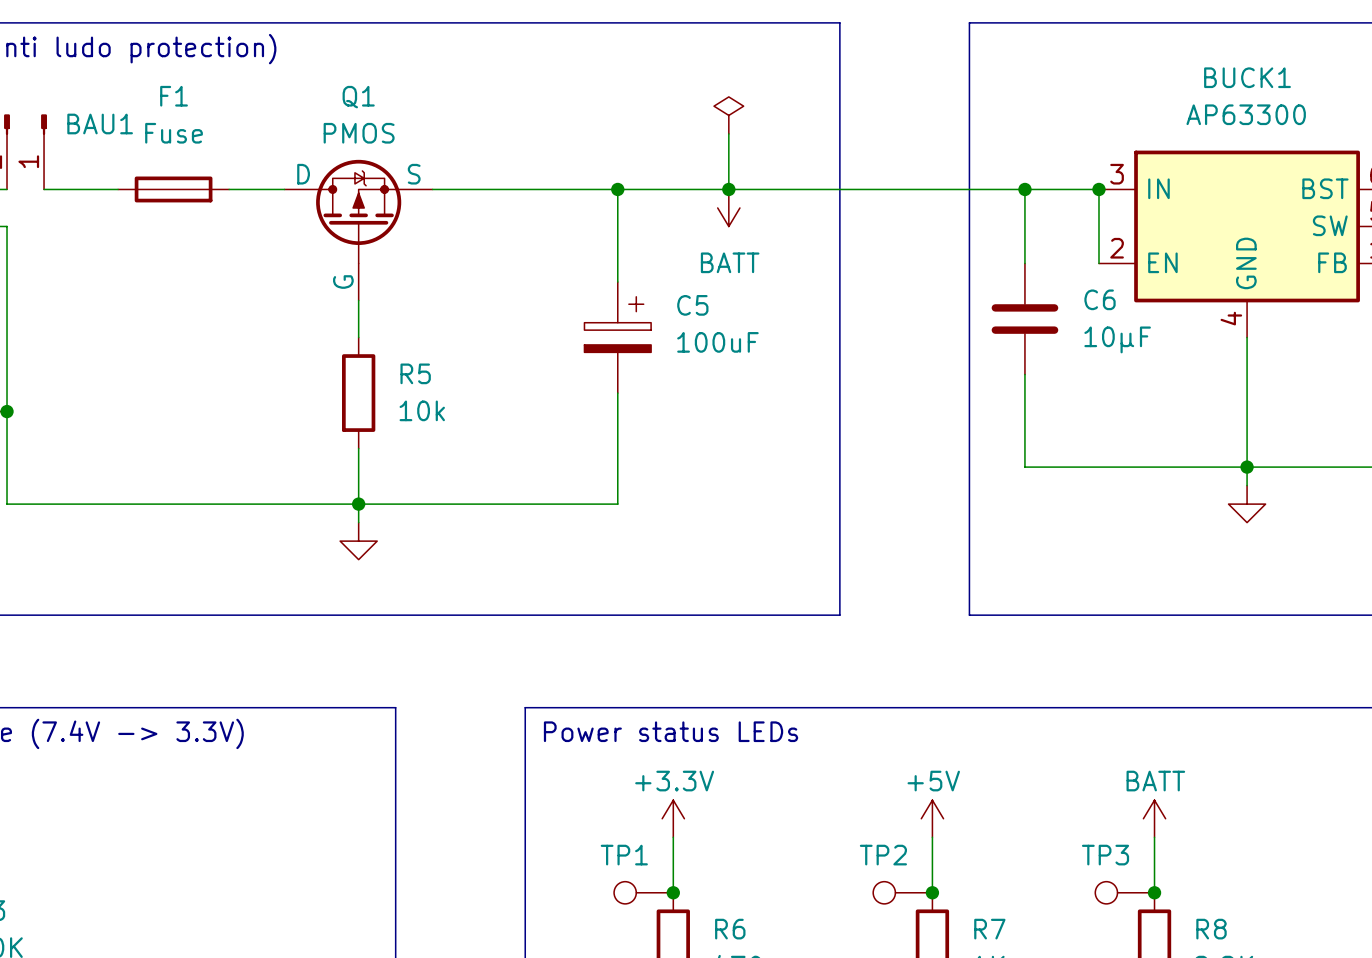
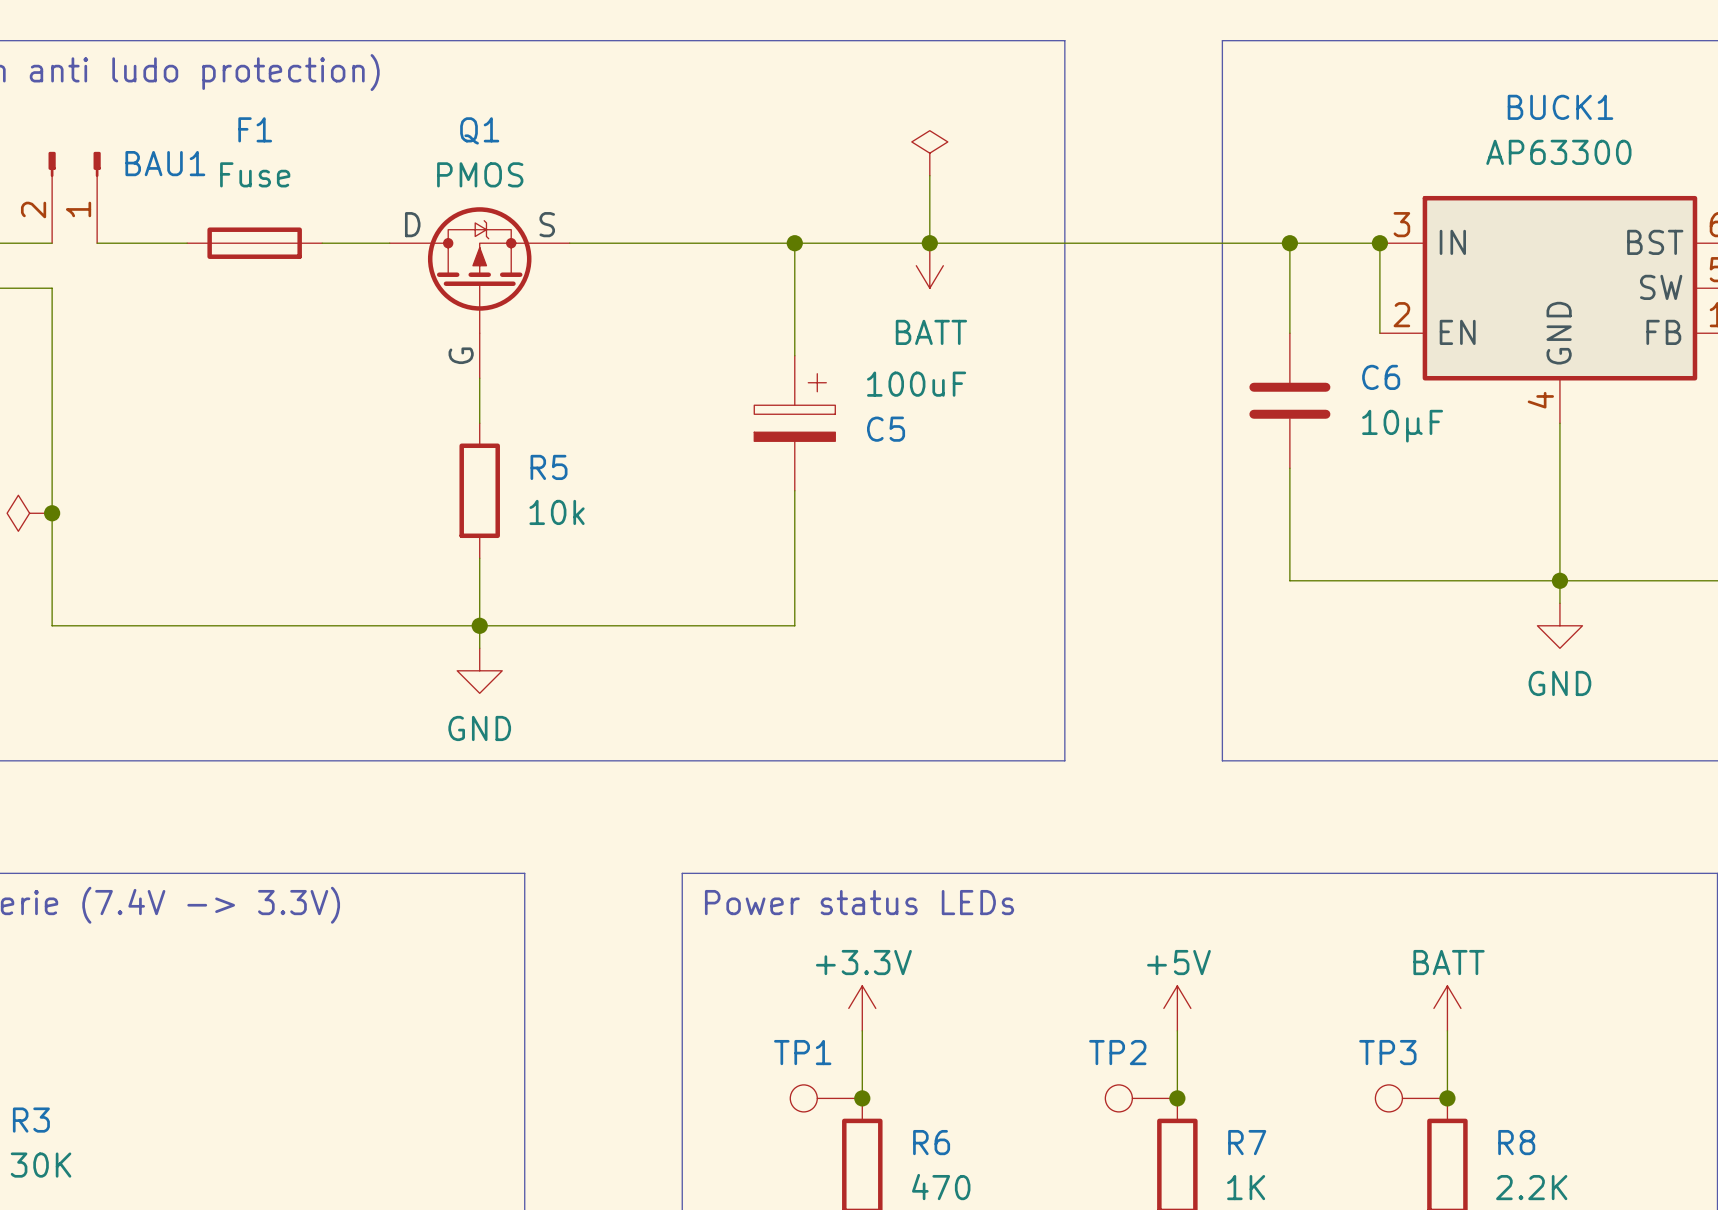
C5 name position: C5 (692, 305) -> C5 (886, 429)
C5 value position: 100uF (717, 342) -> 100uF (916, 384)
power symbol text: none -> GND (1559, 683)
power symbol text: none -> GND (479, 728)

